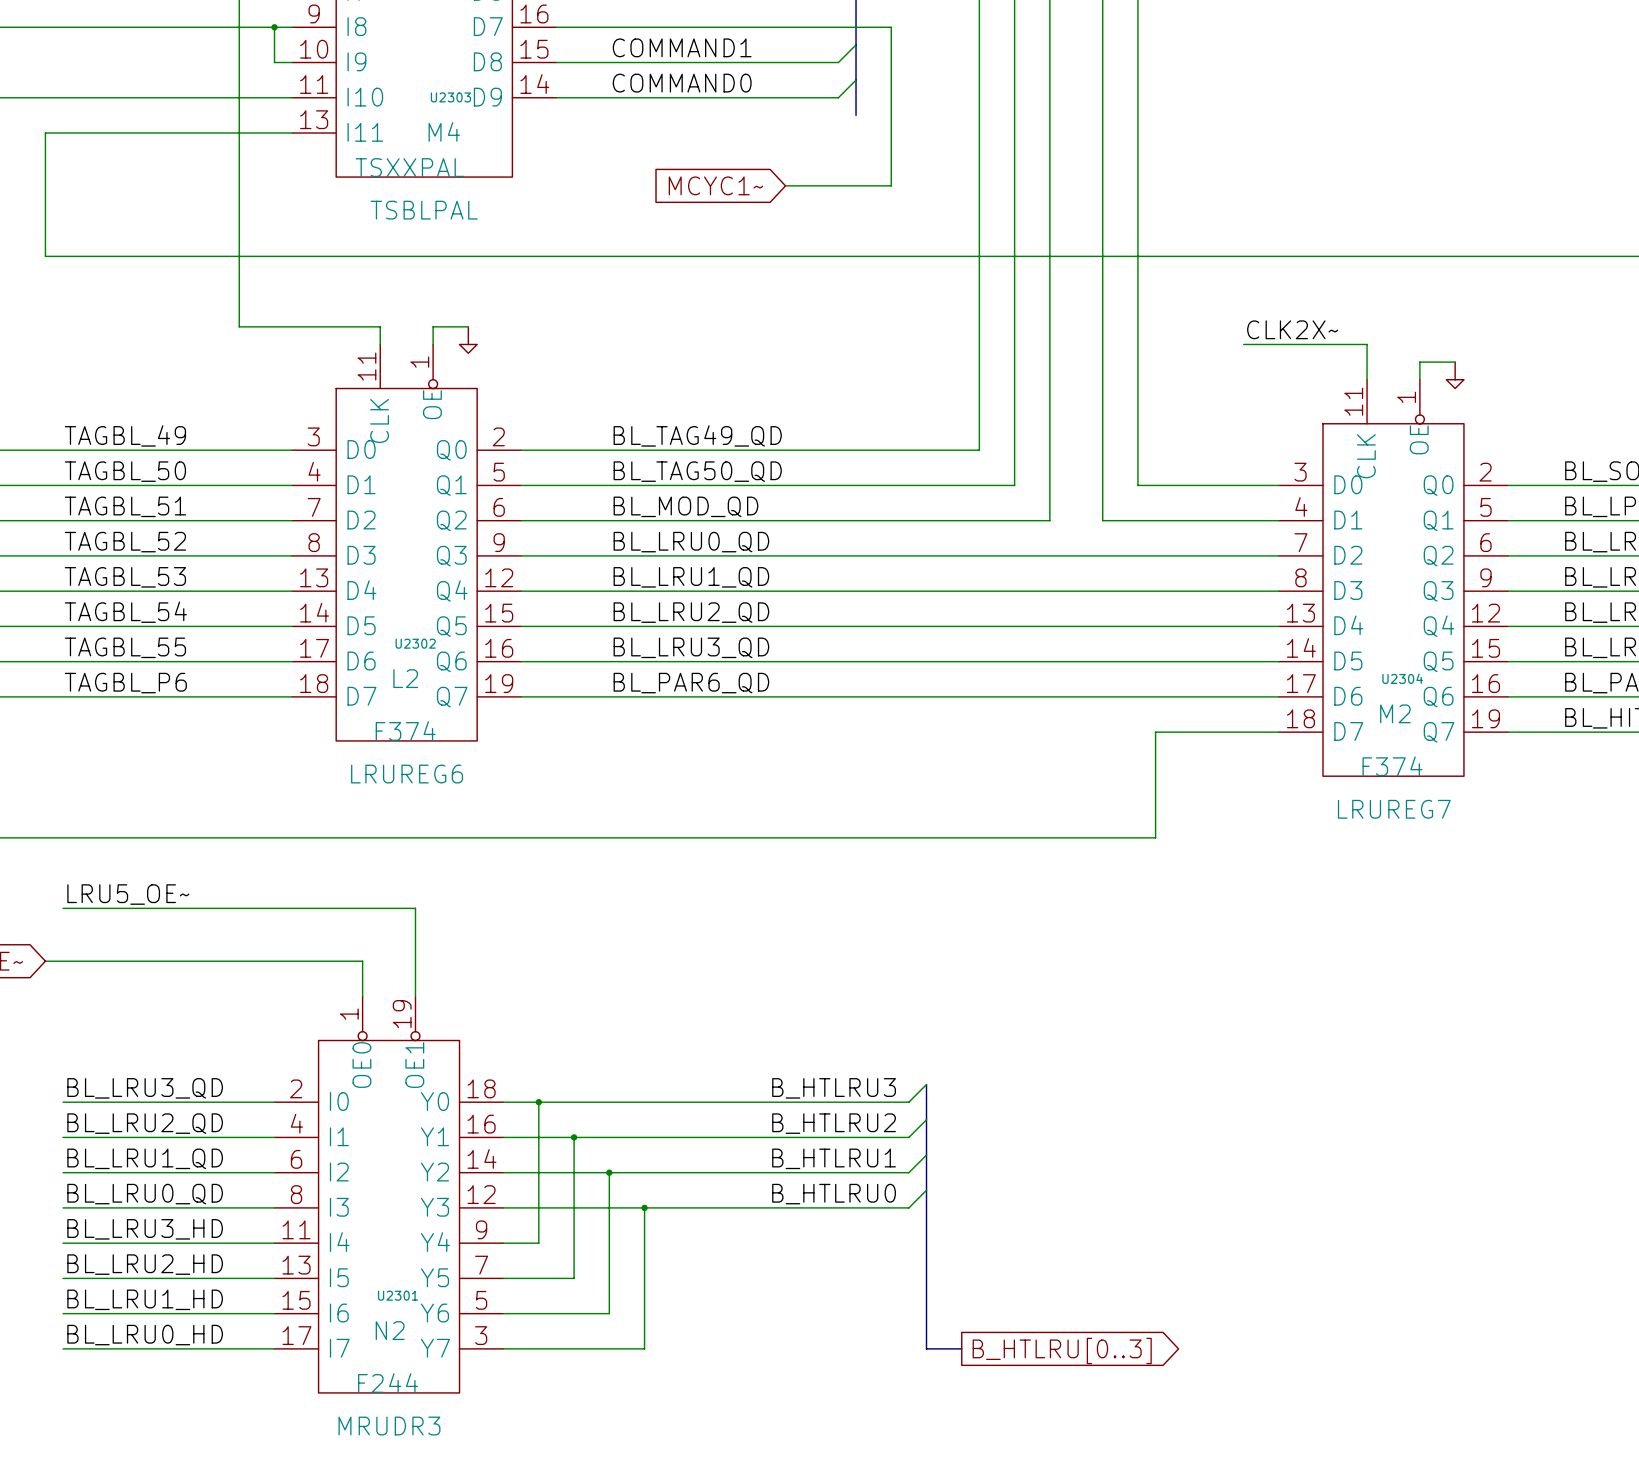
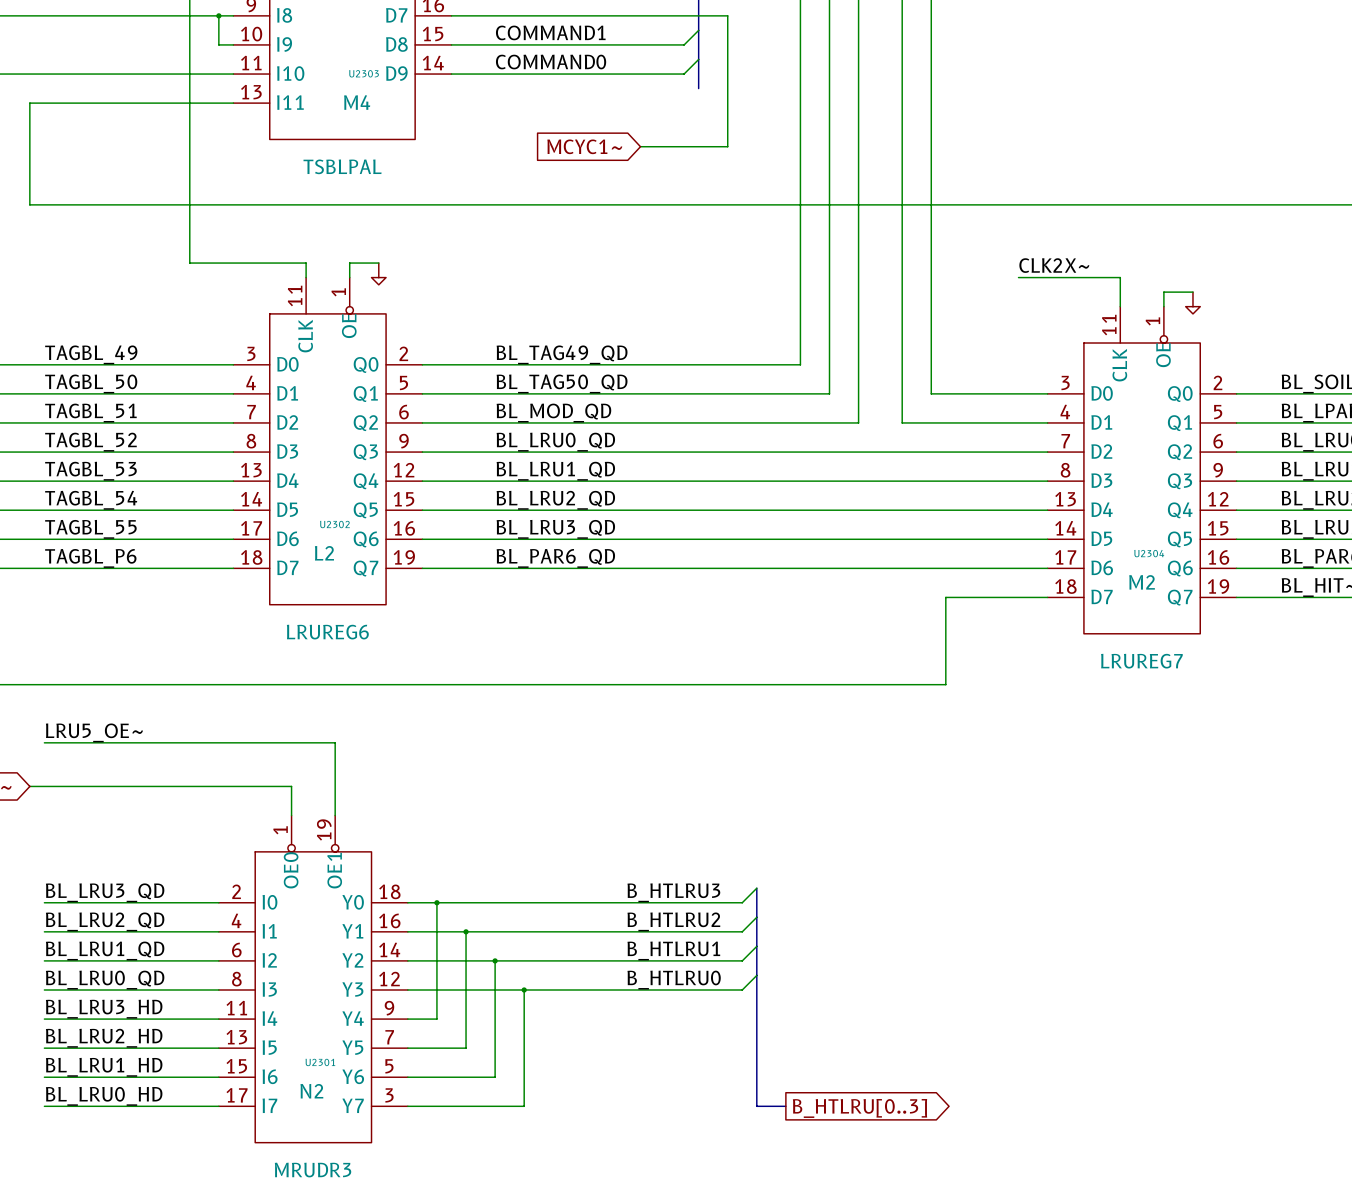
U2303 value: TSXXPAL (409, 167) -> none
U2302 value: F374 (405, 731) -> none
U2304 value: F374 (1392, 766) -> none
U2301 value: F244 (388, 1383) -> none

